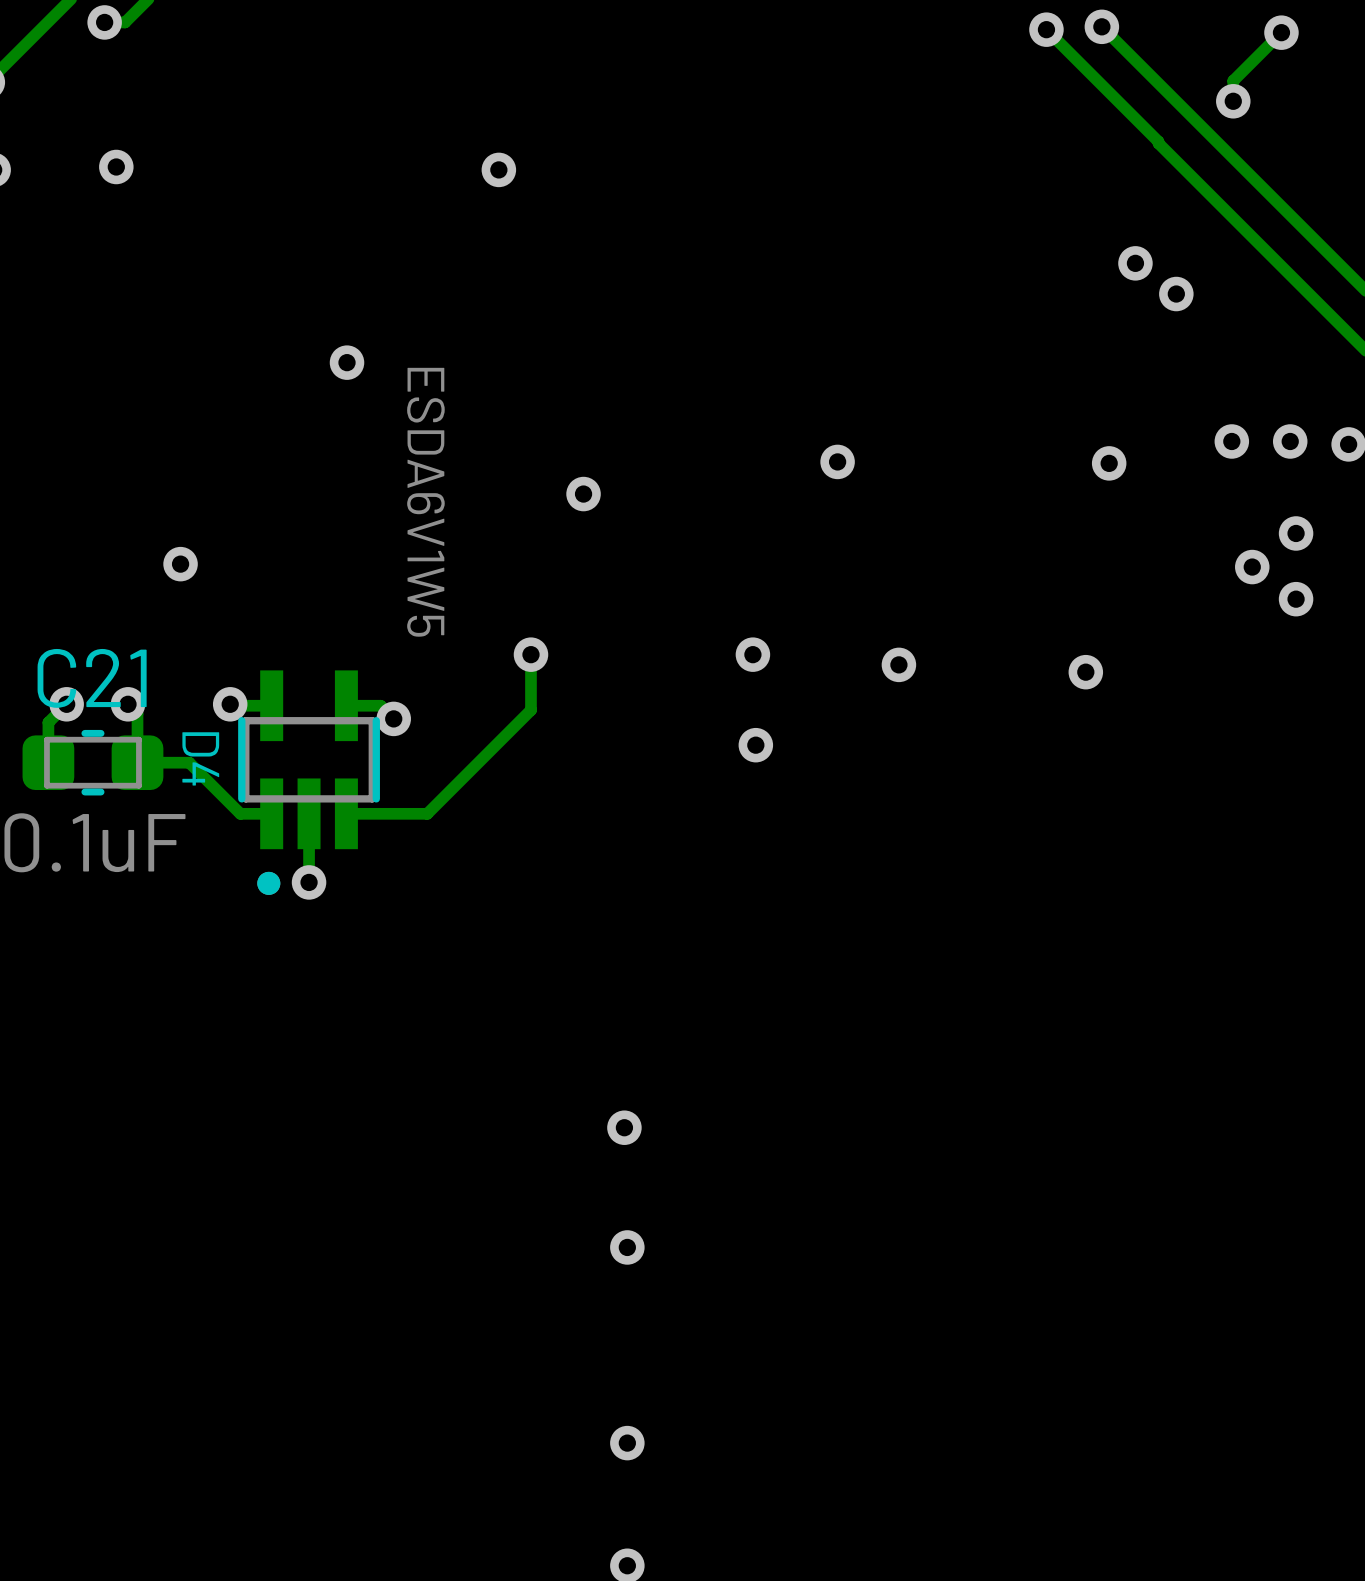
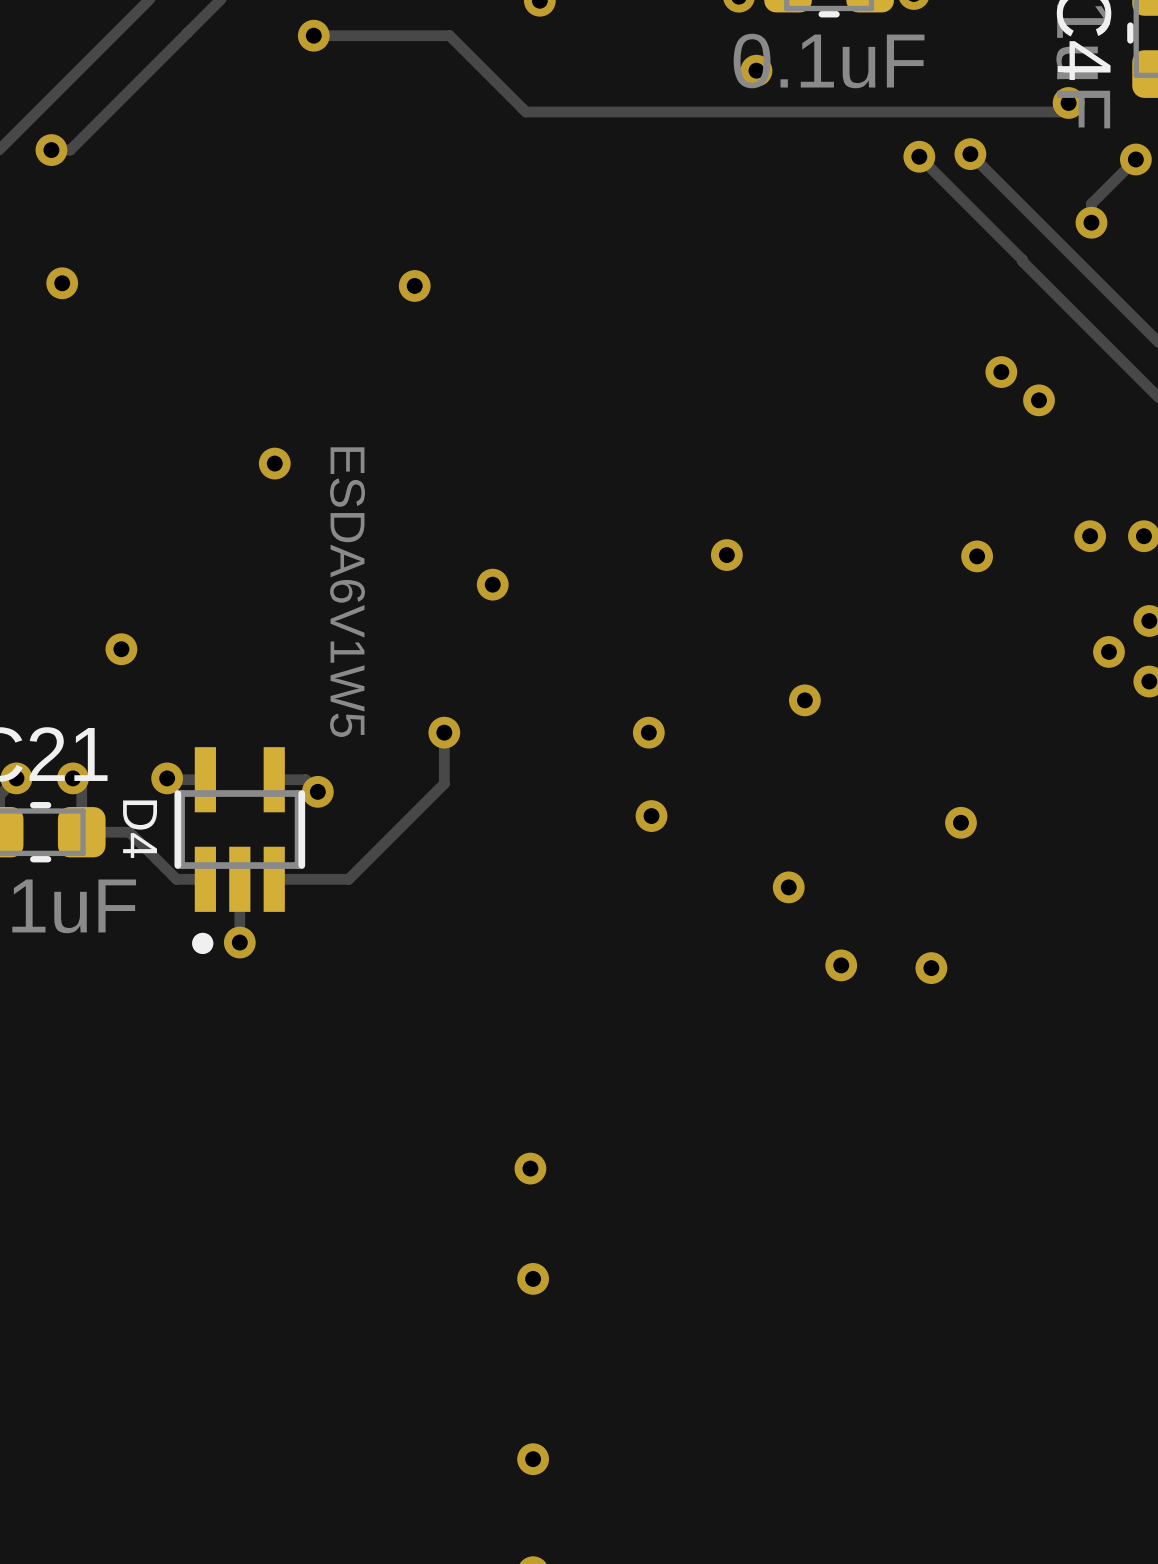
via position: (898, 664) -> (804, 700)
via position: (1085, 672) -> (960, 822)
via: none -> (788, 887)
via: none -> (841, 965)
via: none -> (931, 968)

